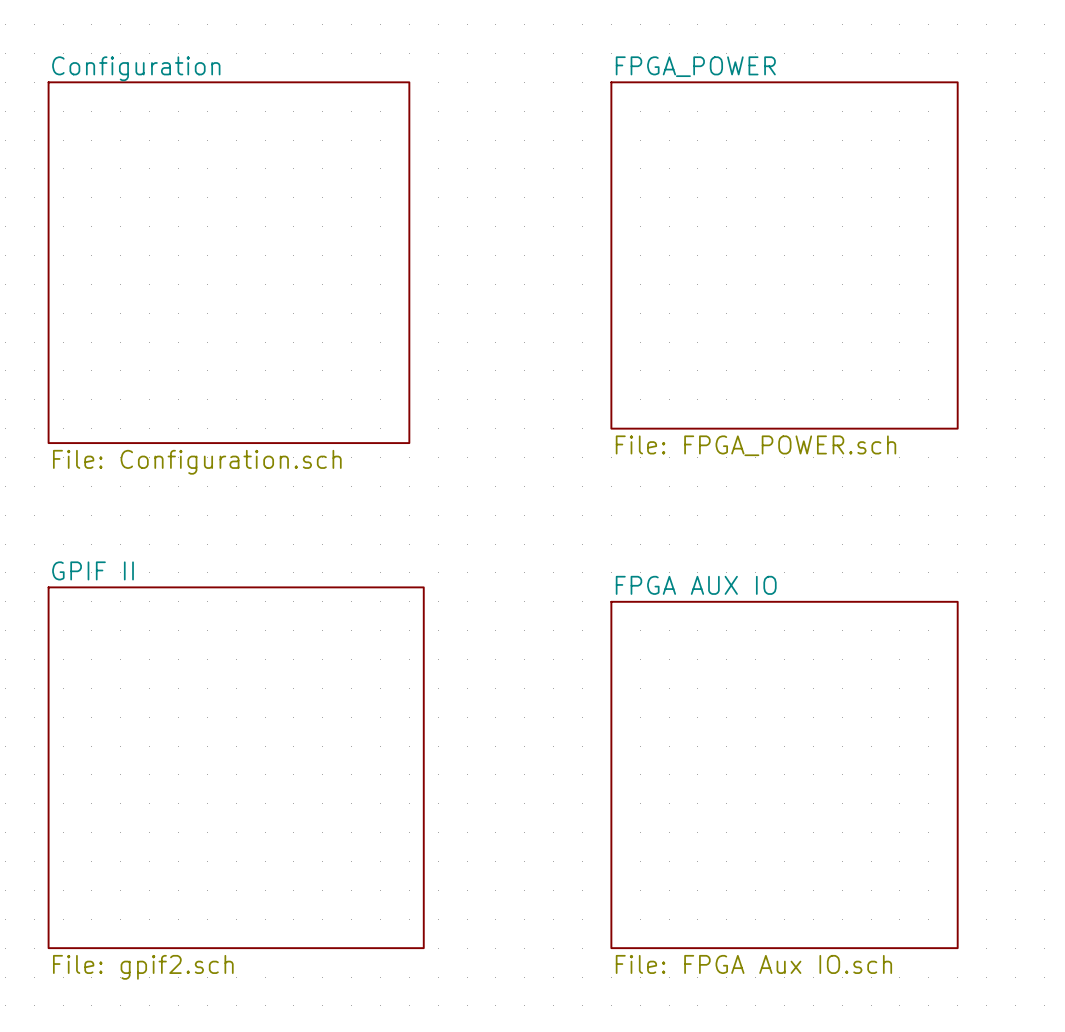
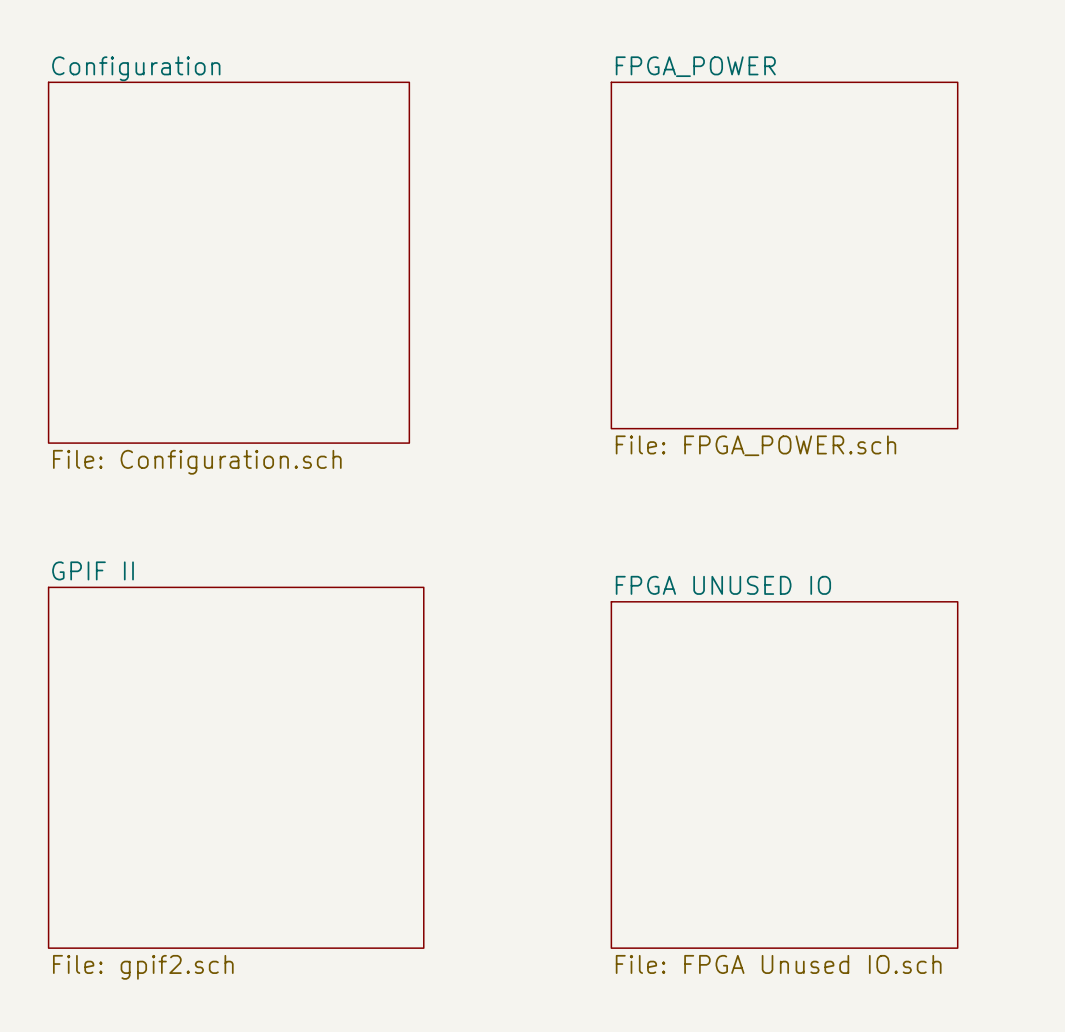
sheet FPGA AUX IO name: FPGA AUX IO (696, 585) -> FPGA UNUSED IO (723, 585)
sheet FPGA AUX IO value: File: FPGA Aux IO.sch (753, 964) -> File: FPGA Unused IO.sch (778, 964)

